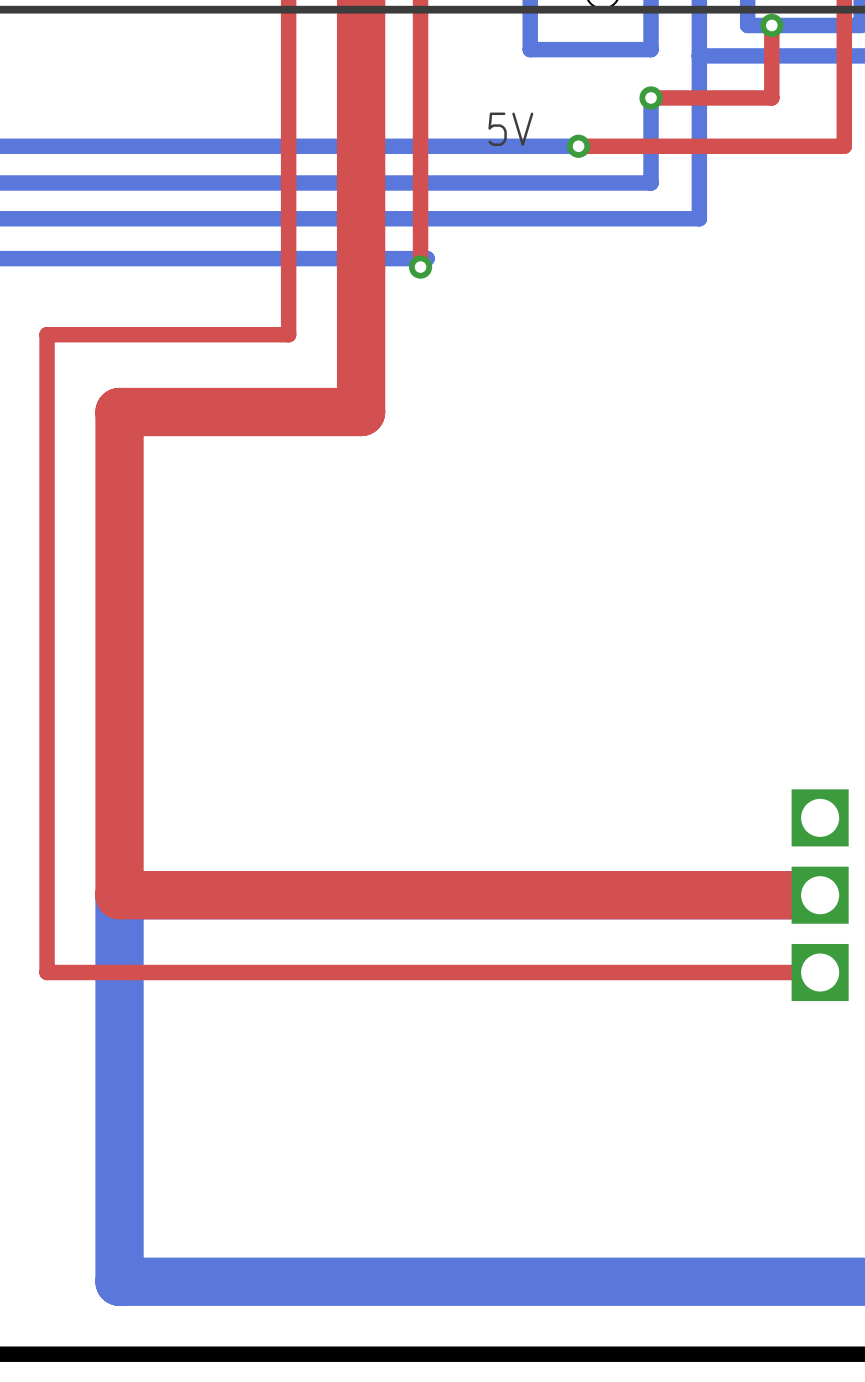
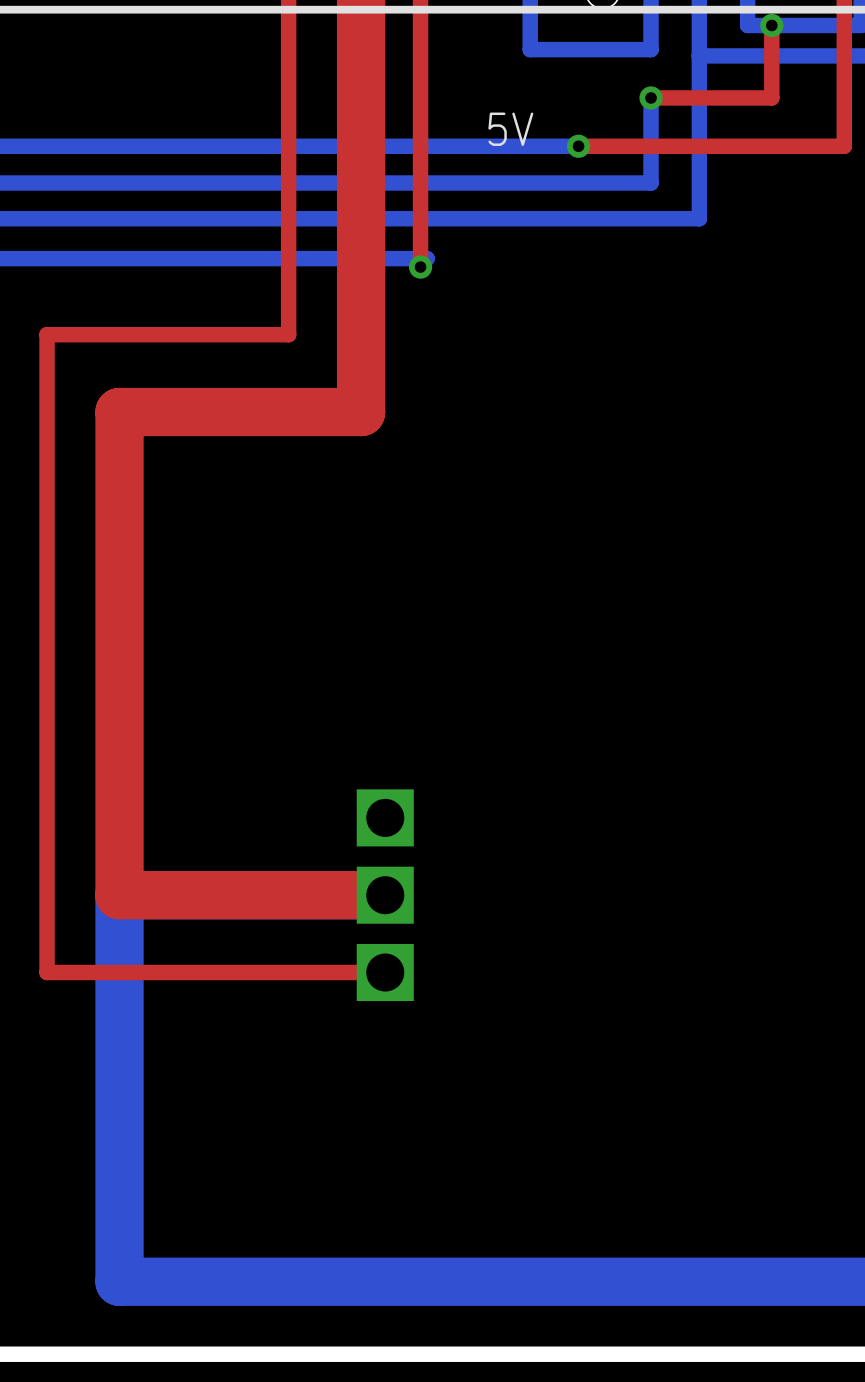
top track: (385, 895) (820, 895) -> none
part position: (820, 895) -> (385, 895)
top track: (385, 972) (820, 972) -> none

